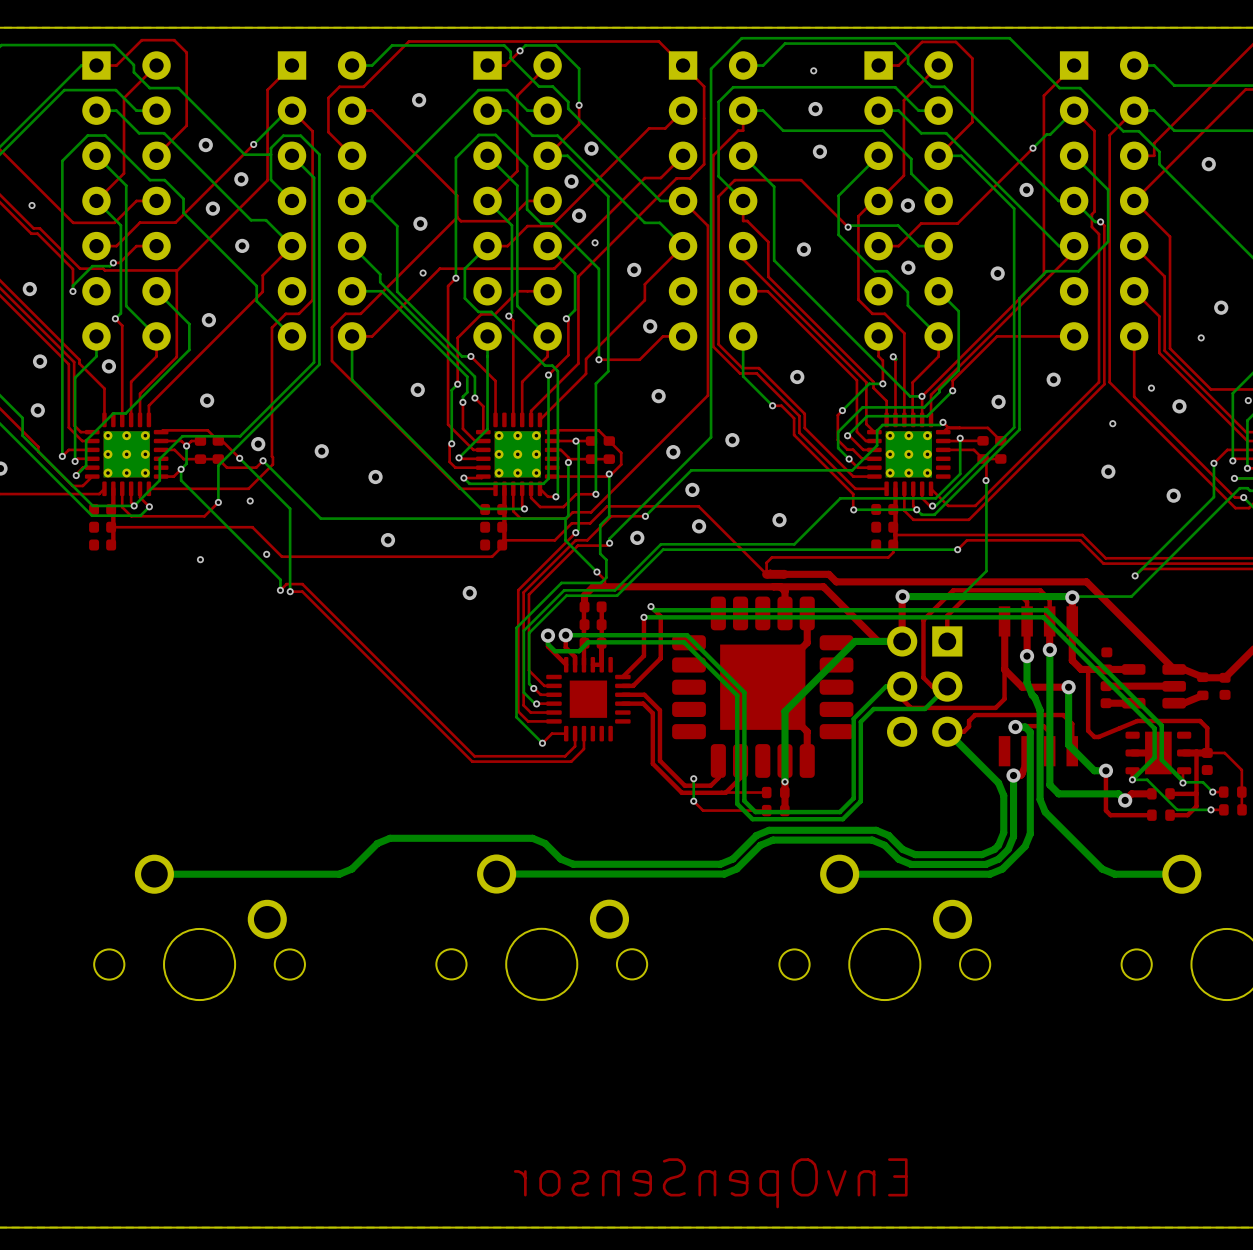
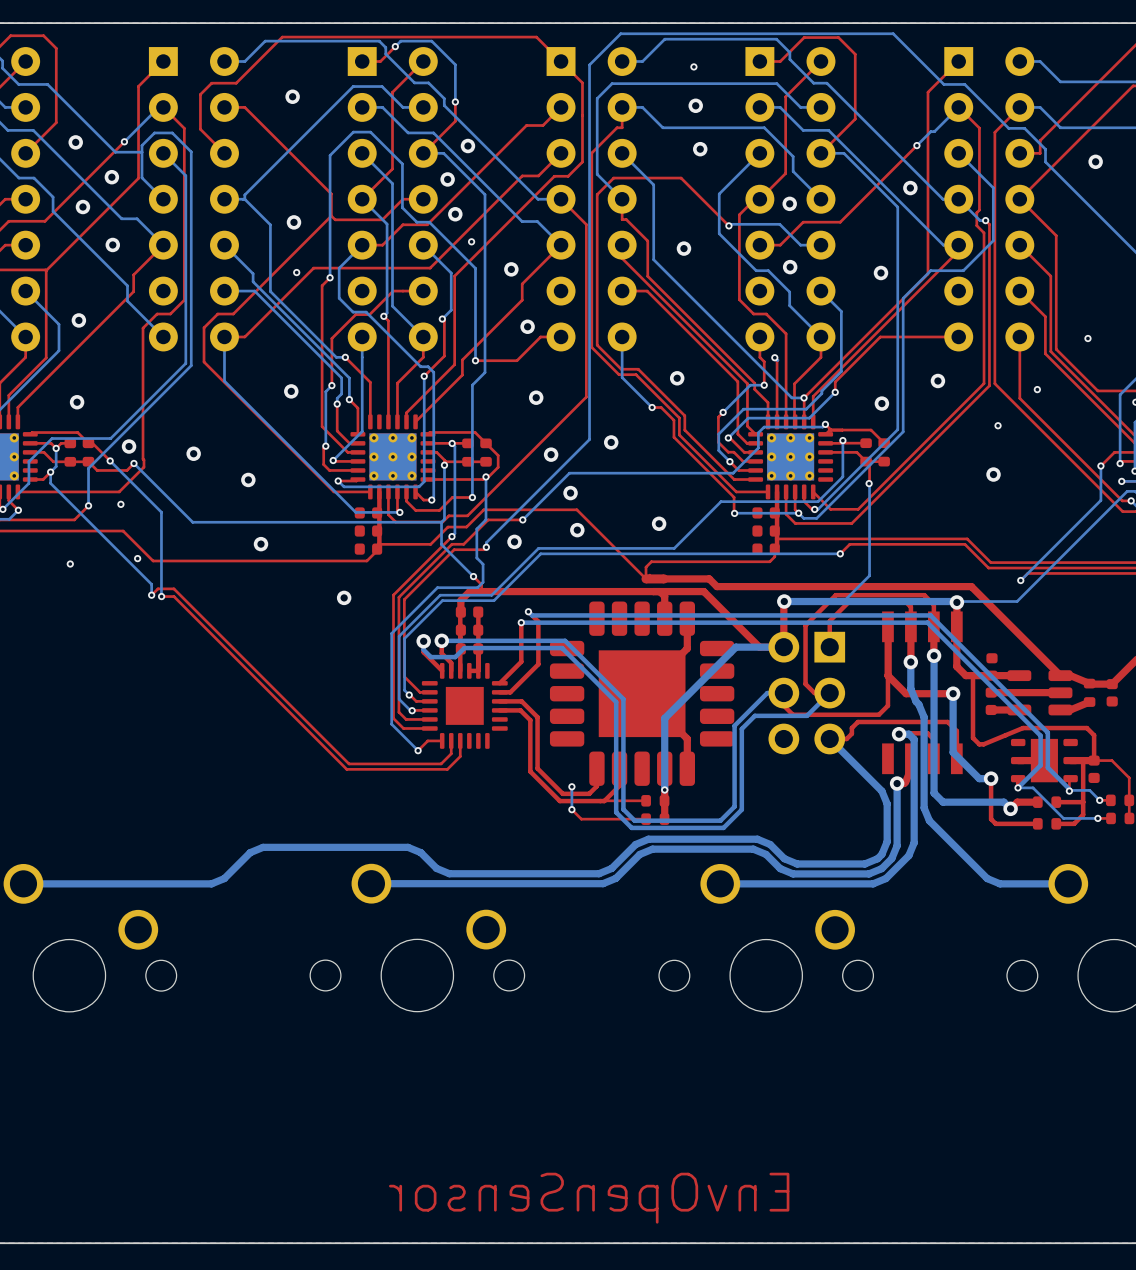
via: (1221, 307) -> none
via: (1179, 406) -> none
via: (1173, 495) -> none

